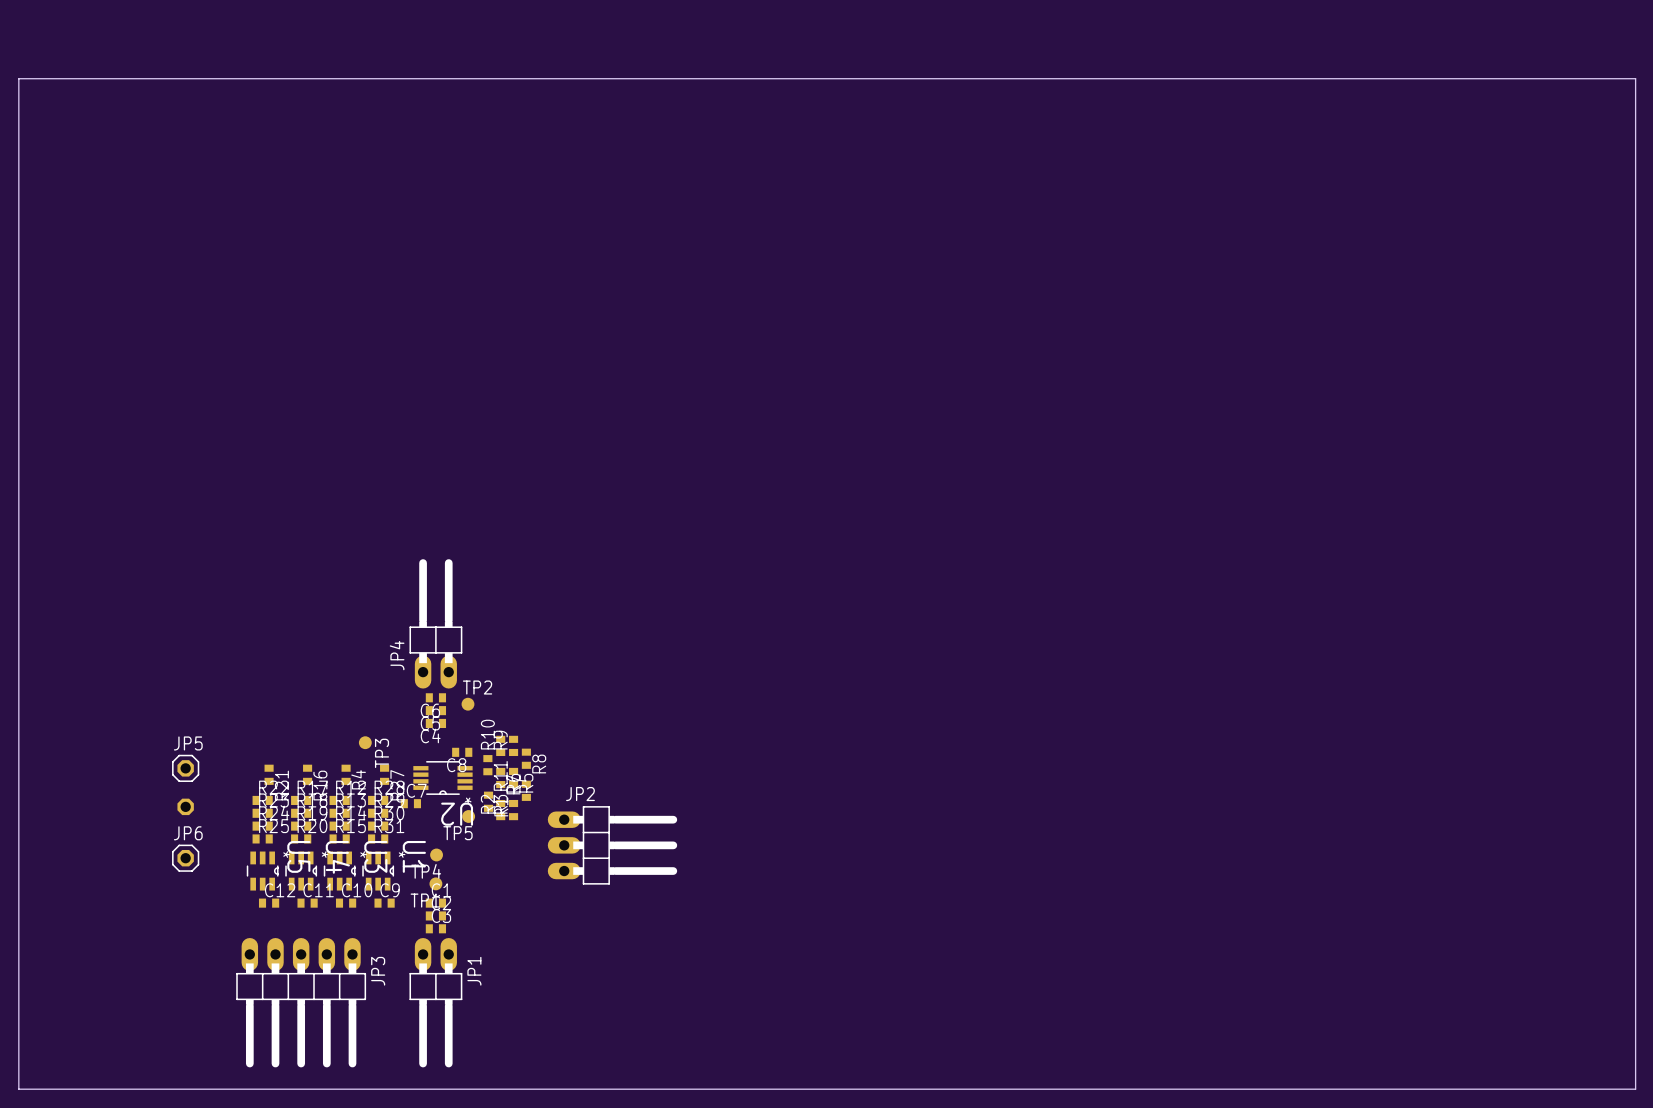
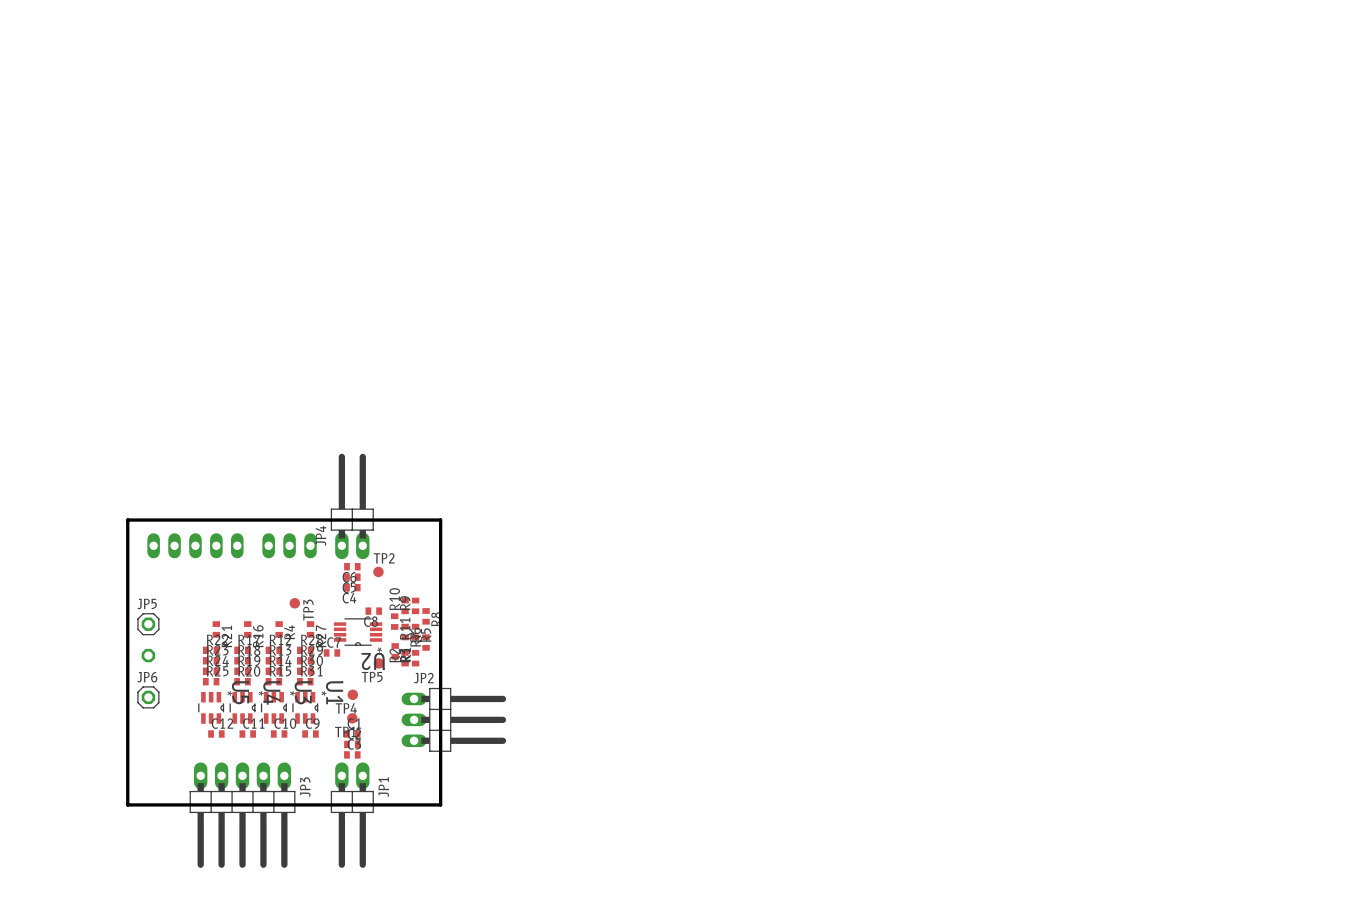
board edge: (18, 78) (1635, 78) (1635, 1089) (18, 1089) (18, 78) -> none
board edge: none -> (127, 520) (440, 520) (440, 804) (127, 804) (127, 520)
part: none -> (195, 545)
part: none -> (289, 545)
JP2 footprint: [547, 806, 678, 885] -> [401, 687, 507, 752]

